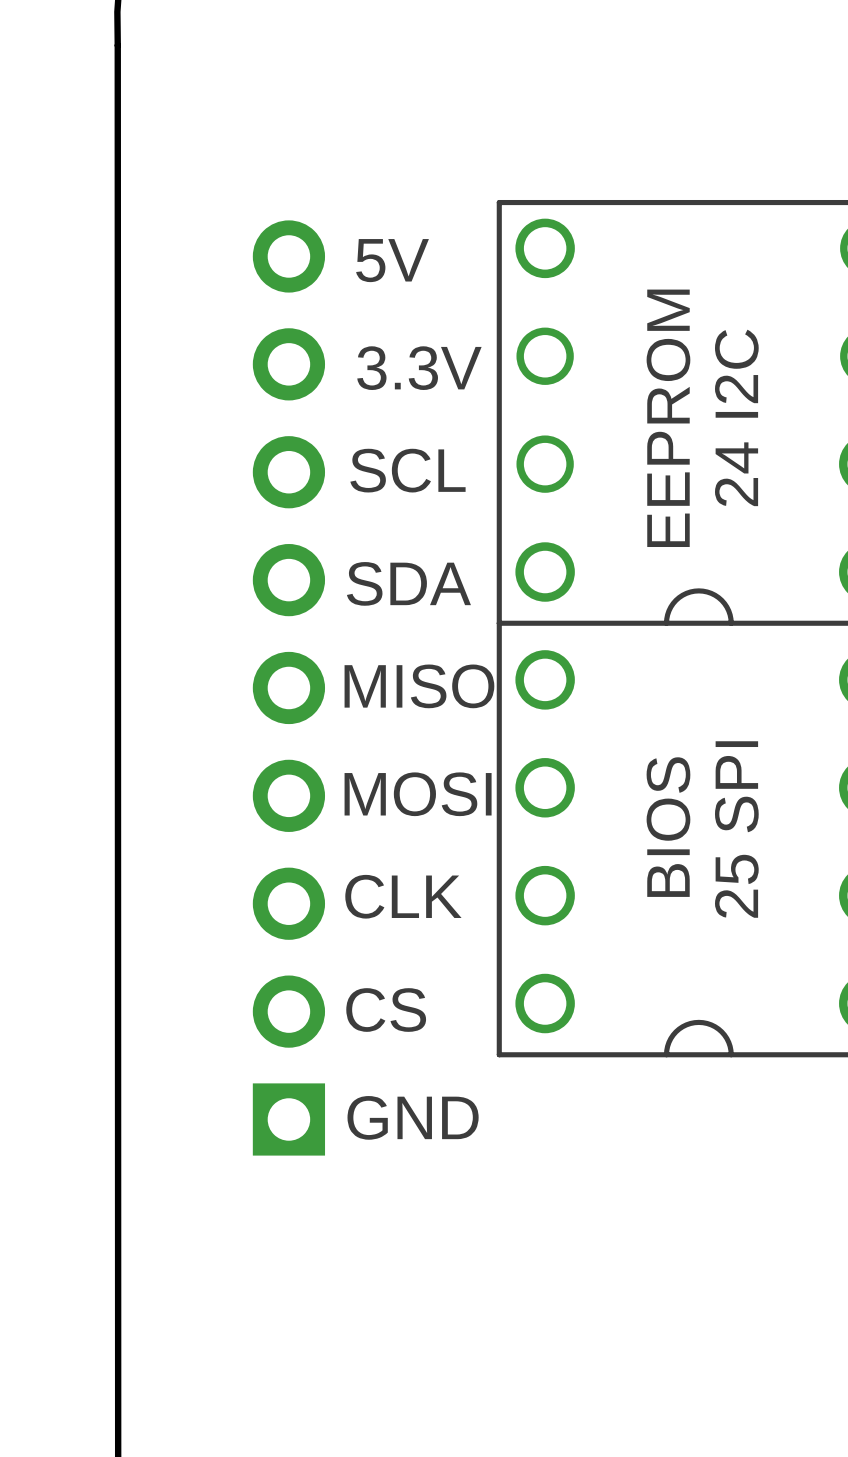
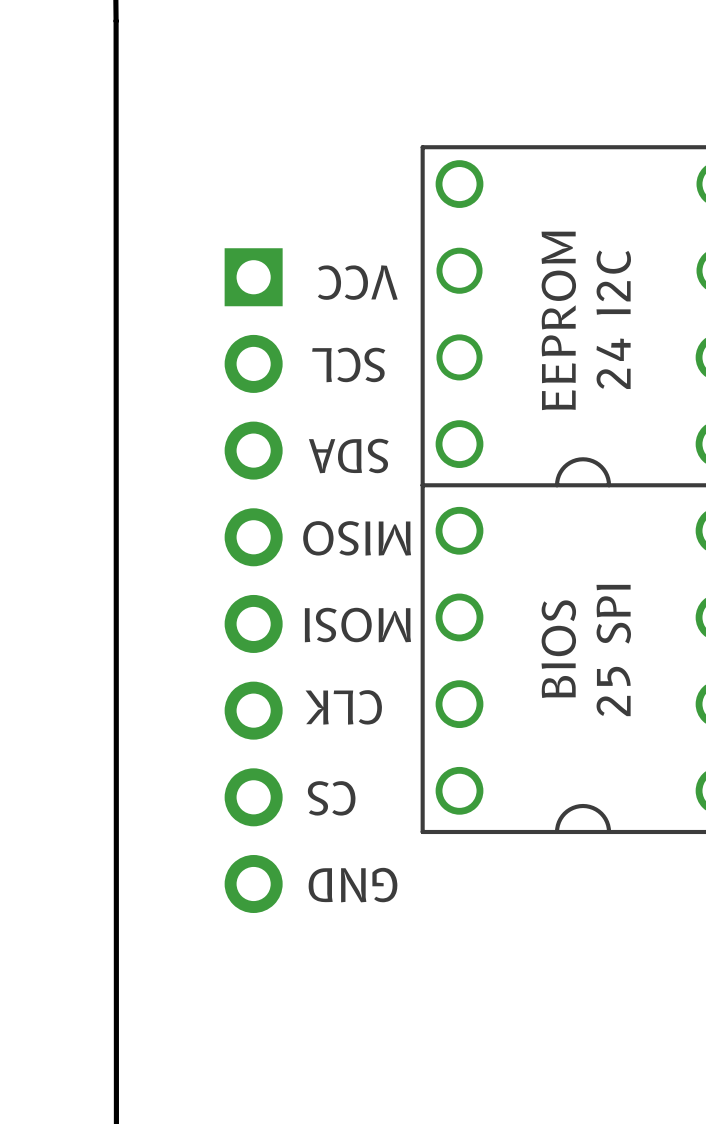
text: 5V (392, 260) -> none
text: 3.3V (419, 368) -> VCC (357, 282)
text rotation: 0° (407, 470) -> 180° (348, 365)
text rotation: 0° (408, 583) -> 180° (348, 456)
text rotation: 0° (419, 686) -> 180° (357, 538)
part: (288, 687) -> none
part: none -> (253, 580)
text rotation: 0° (418, 794) -> 180° (357, 625)
text rotation: 0° (403, 896) -> 180° (343, 707)
text rotation: 0° (386, 1010) -> 180° (331, 798)
text rotation: 0° (413, 1117) -> 180° (353, 885)

